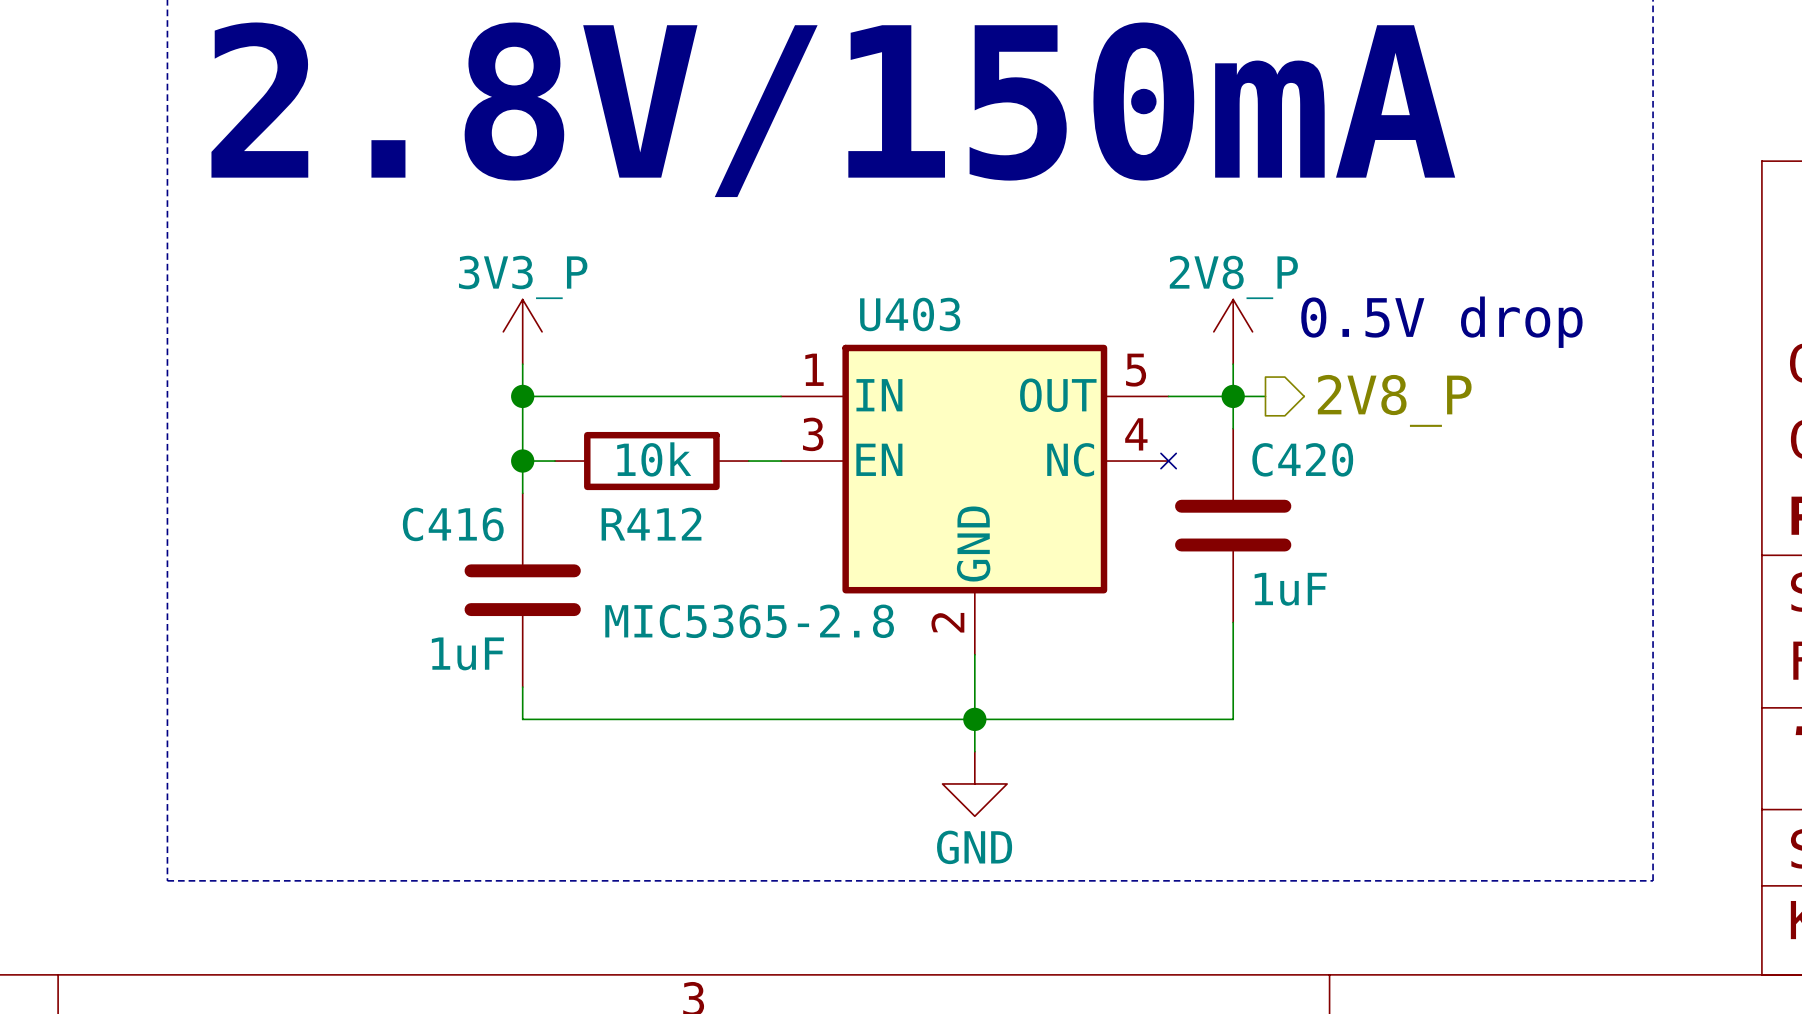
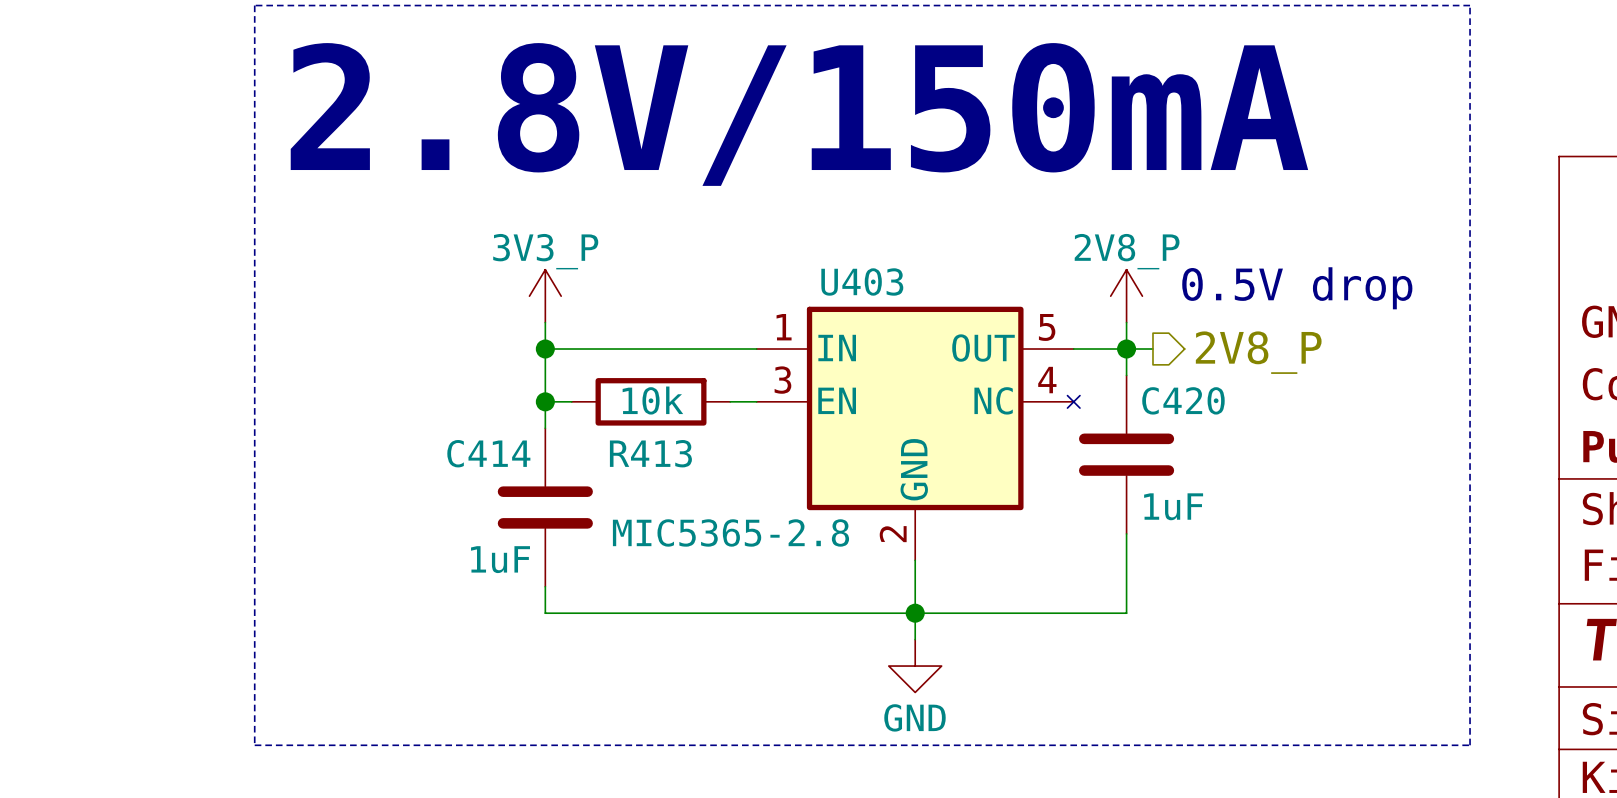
C416 name: C416 (453, 524) -> C414 (488, 453)
R412 name: R412 (651, 524) -> R413 (650, 453)

